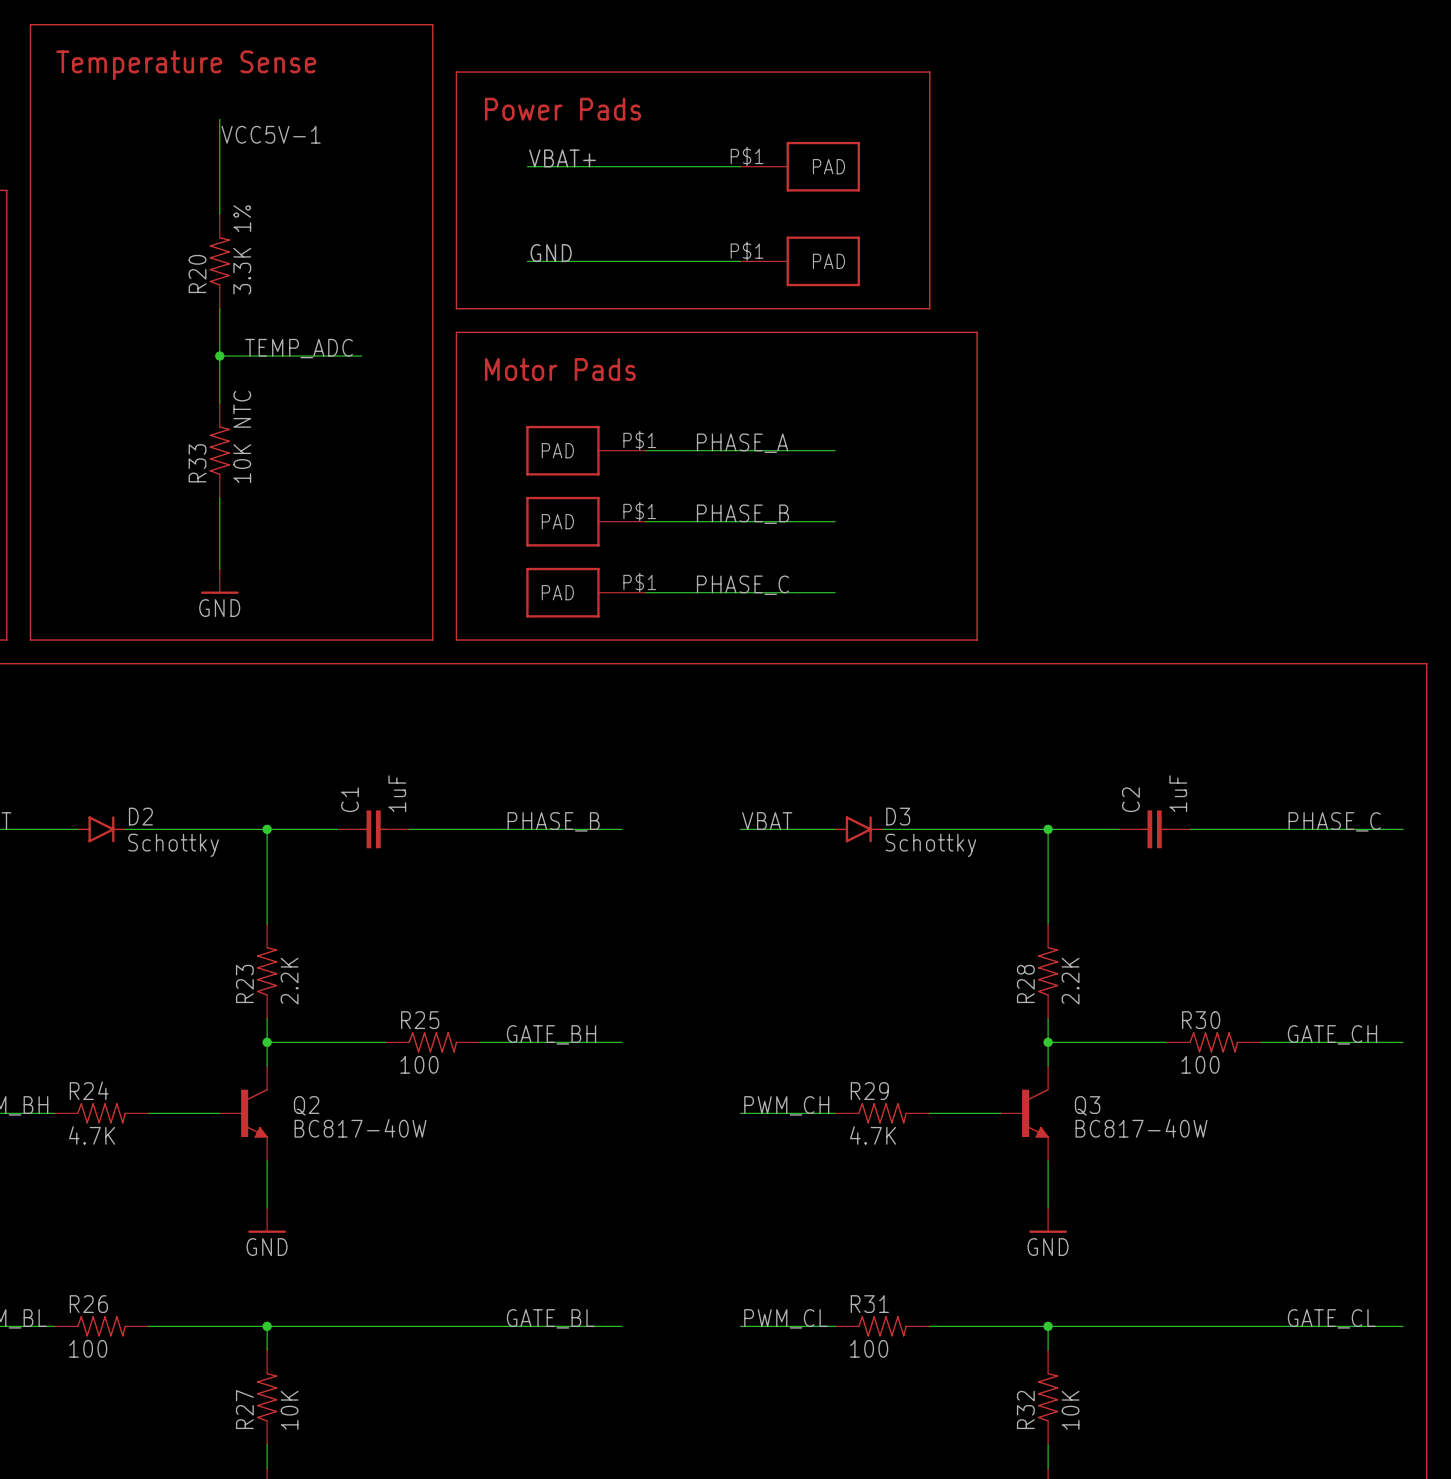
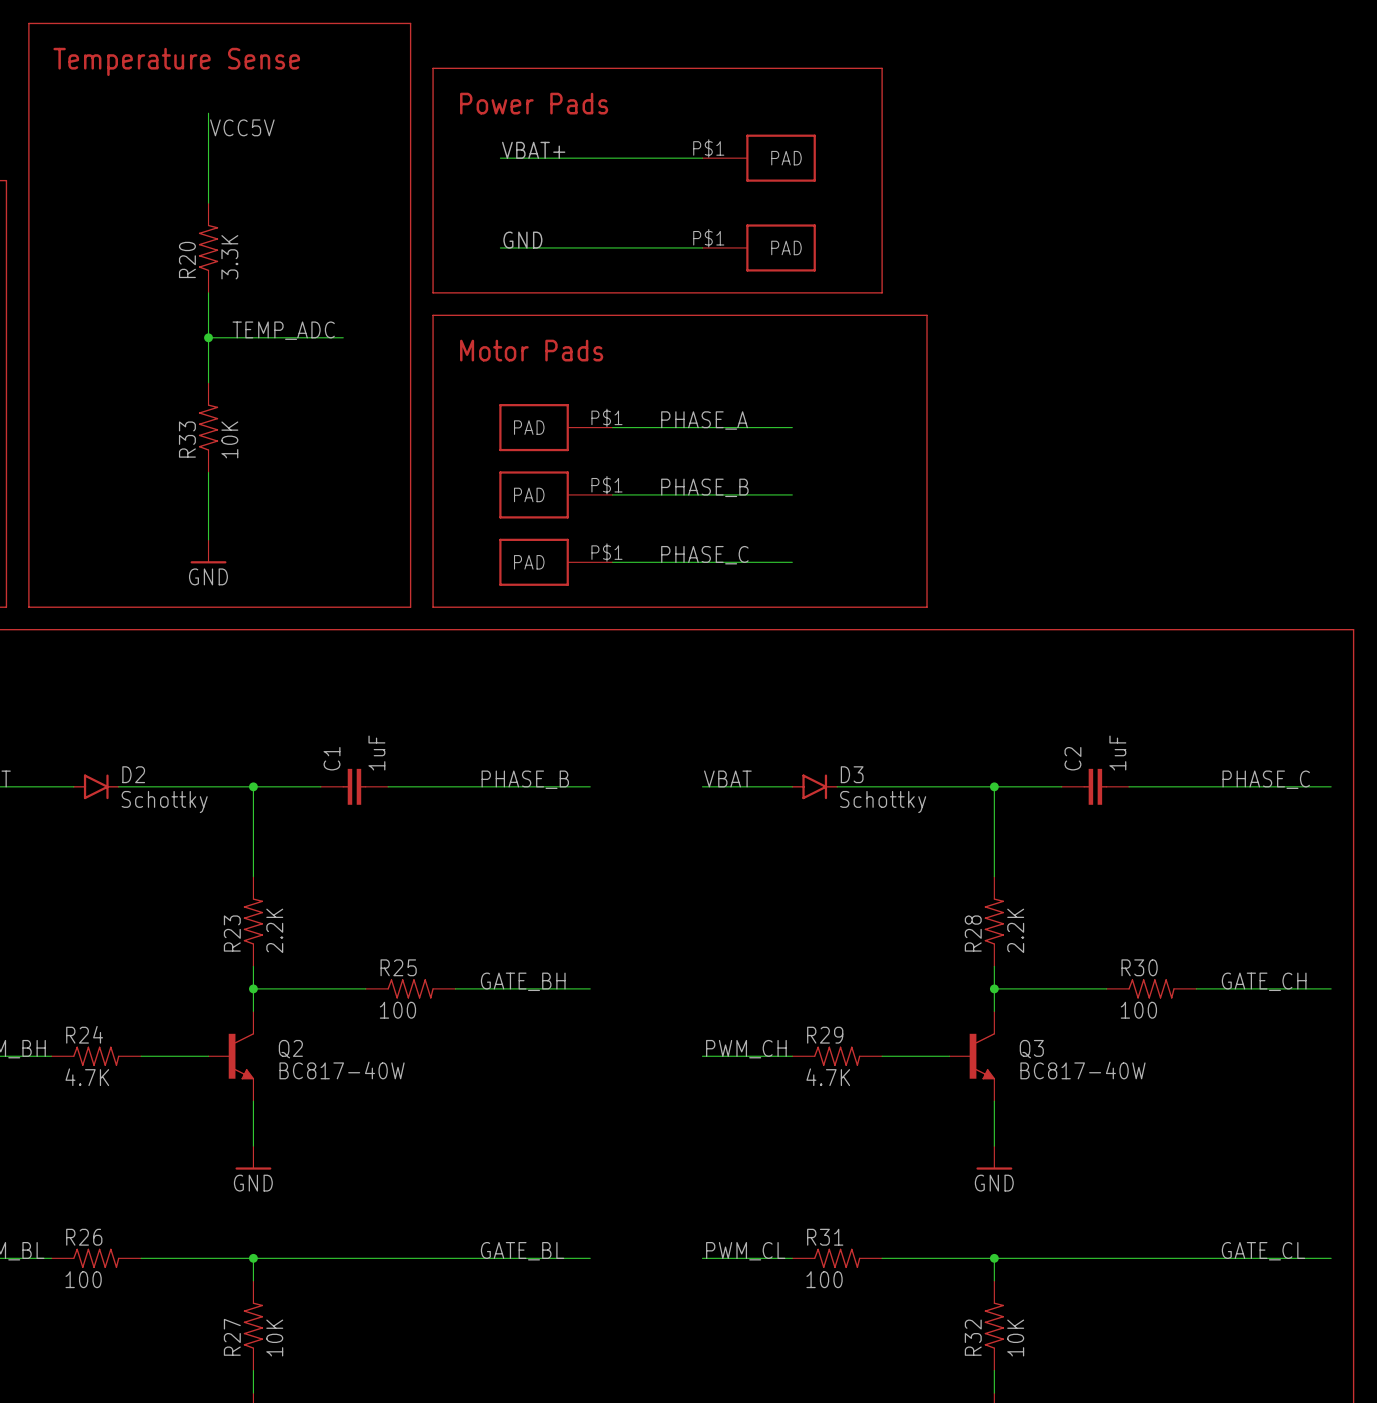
label: VCC5V-1 (271, 134) -> VCC5V (242, 127)
R20 value: 3.3K 1% (242, 249) -> 3.3K (229, 257)
R33 value: 10K NTC (242, 437) -> 10K (229, 439)

